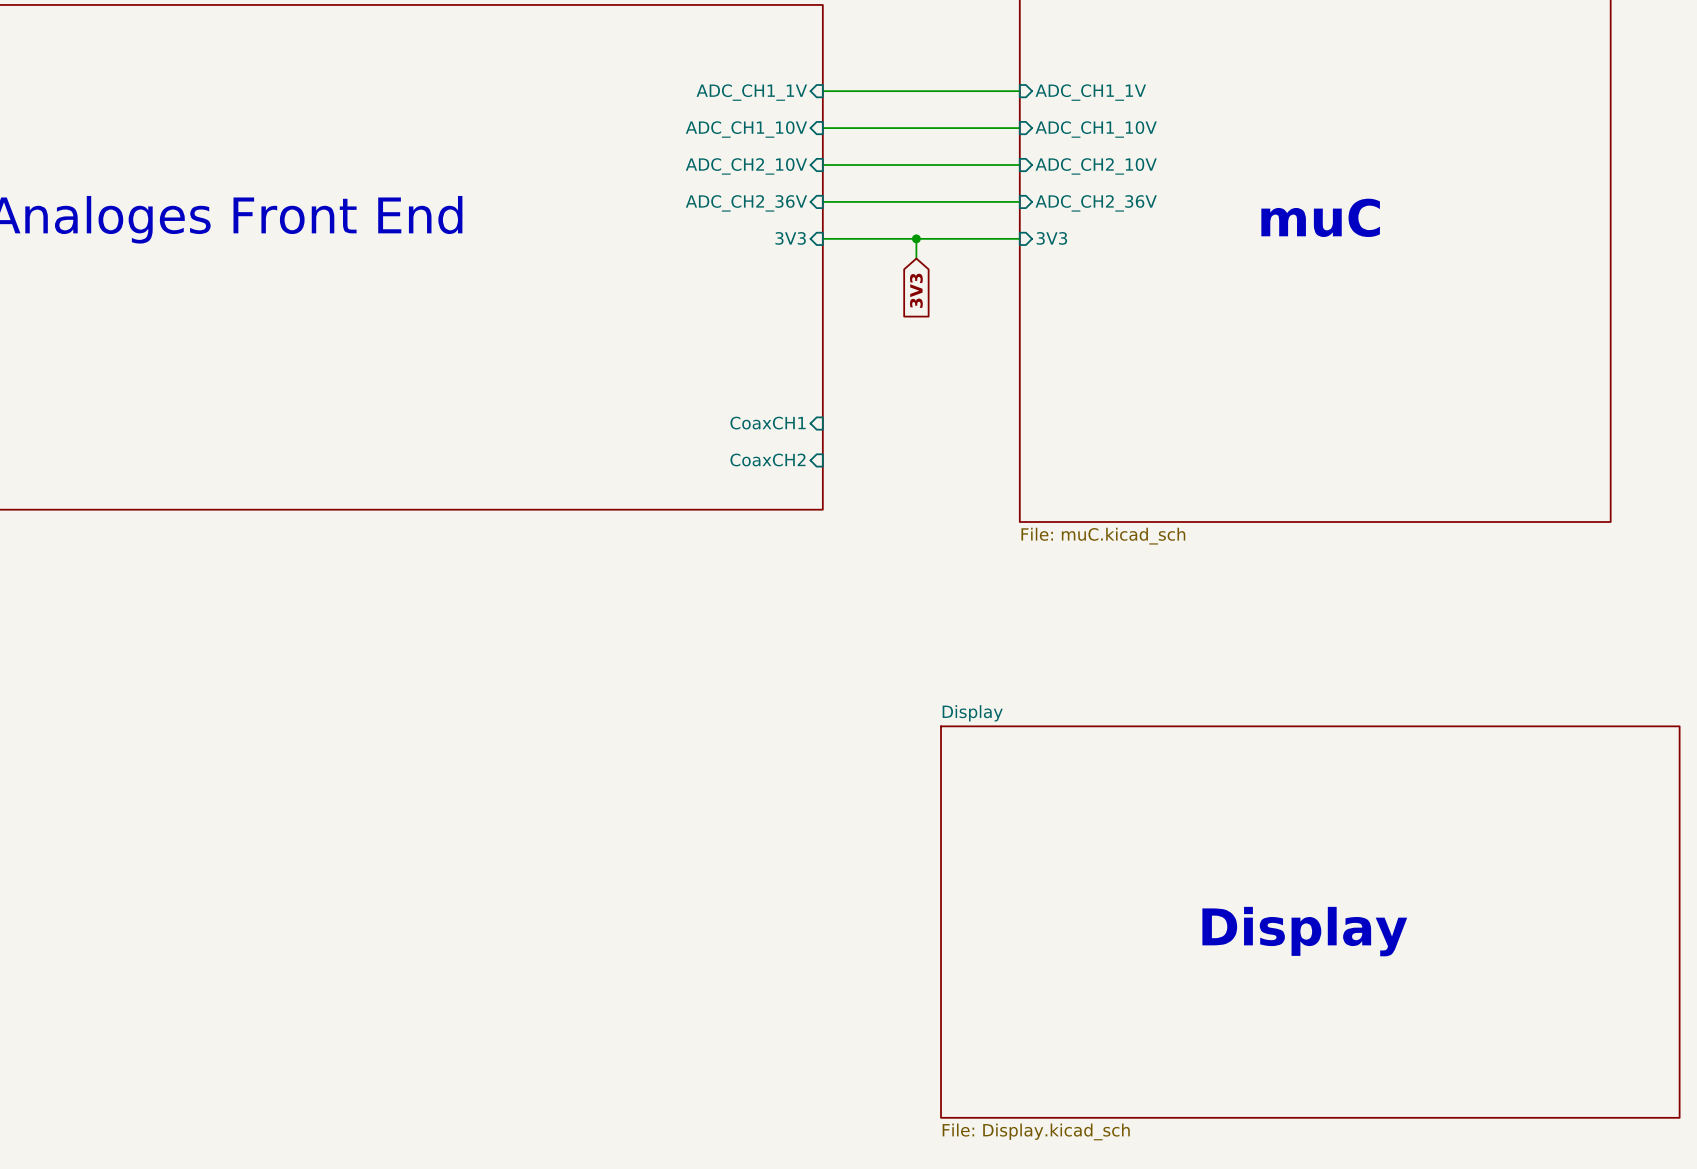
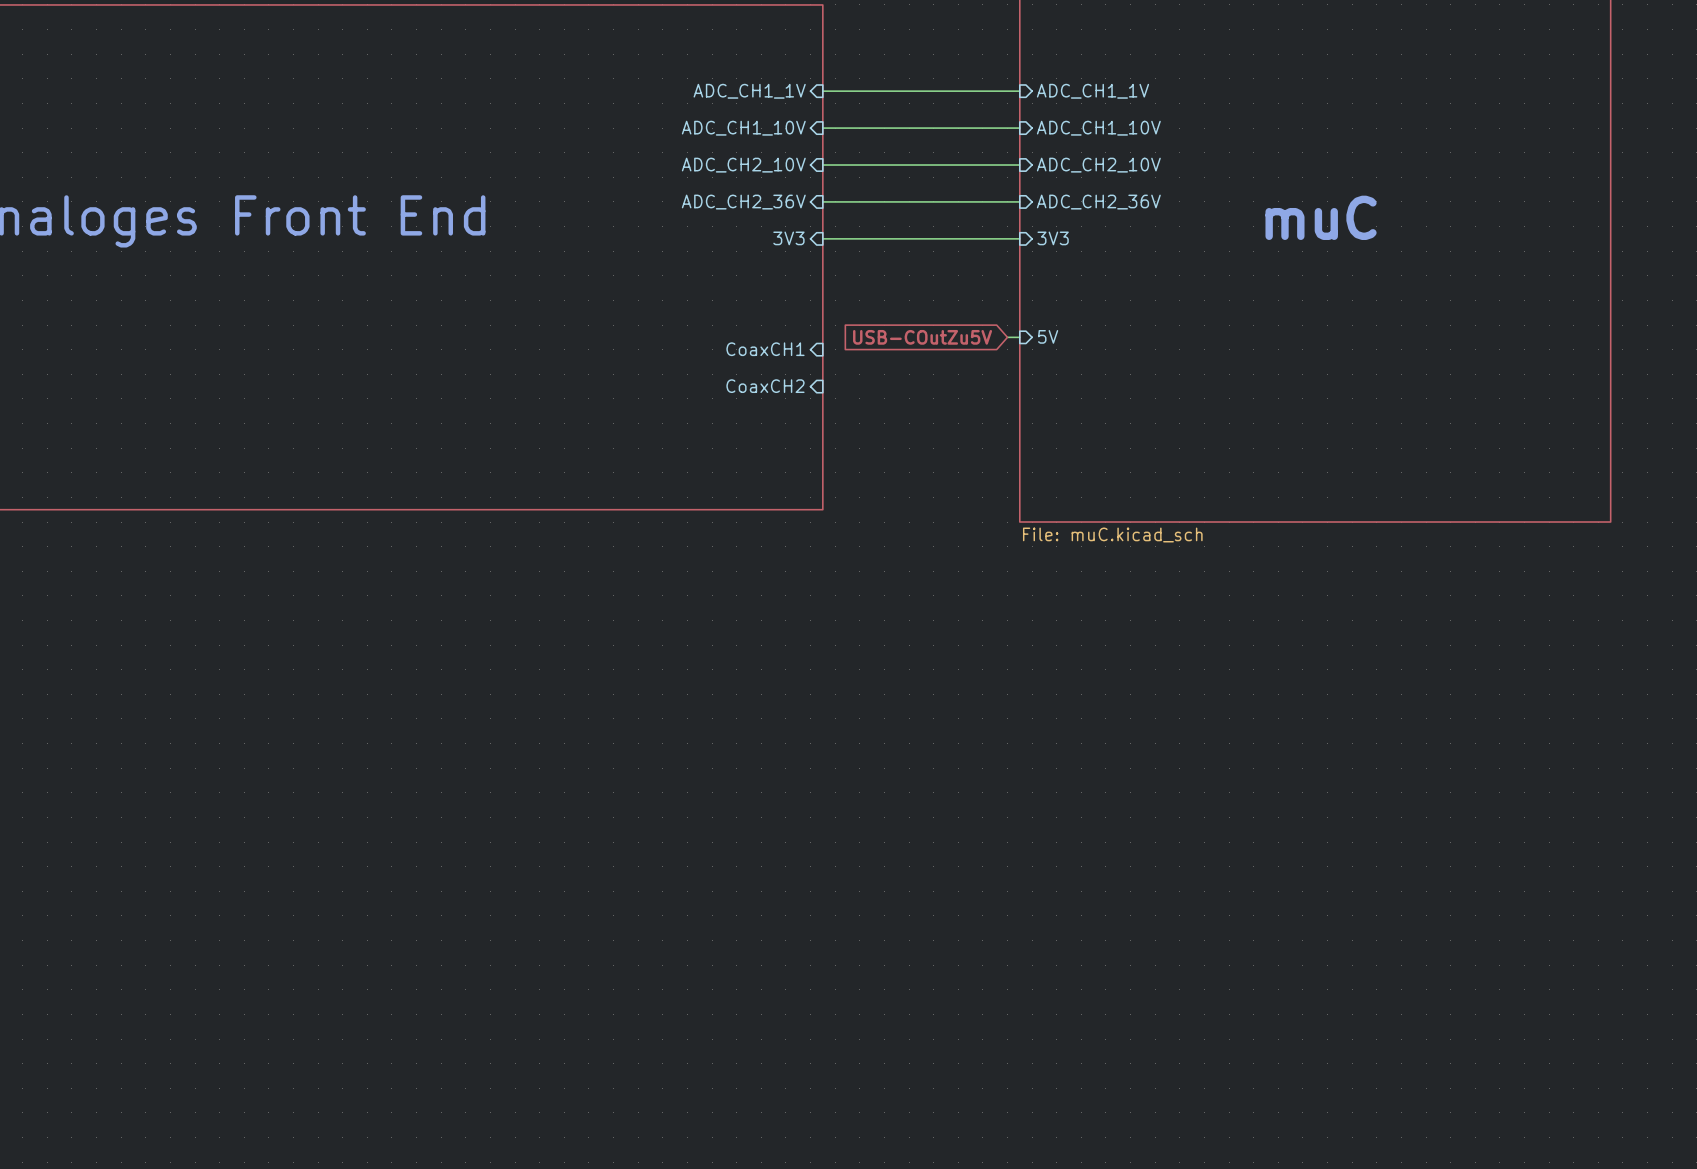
wire: (916, 238) (916, 258) -> none
junction: (916, 238) -> none
global label: 3V3 (916, 290) -> none
global label: none -> USB-COutZu5V (922, 337)
wire: none -> (1007, 337) (1019, 337)
sheet pin: none -> 5V (1048, 336)
sheet pin position: CoaxCH1 (768, 423) -> CoaxCH1 (765, 349)
sheet pin position: CoaxCH2 (767, 460) -> CoaxCH2 (765, 386)
sheet Display: File: Display.kicad_sch (1310, 922) -> none
text: Display (1304, 931) -> none

